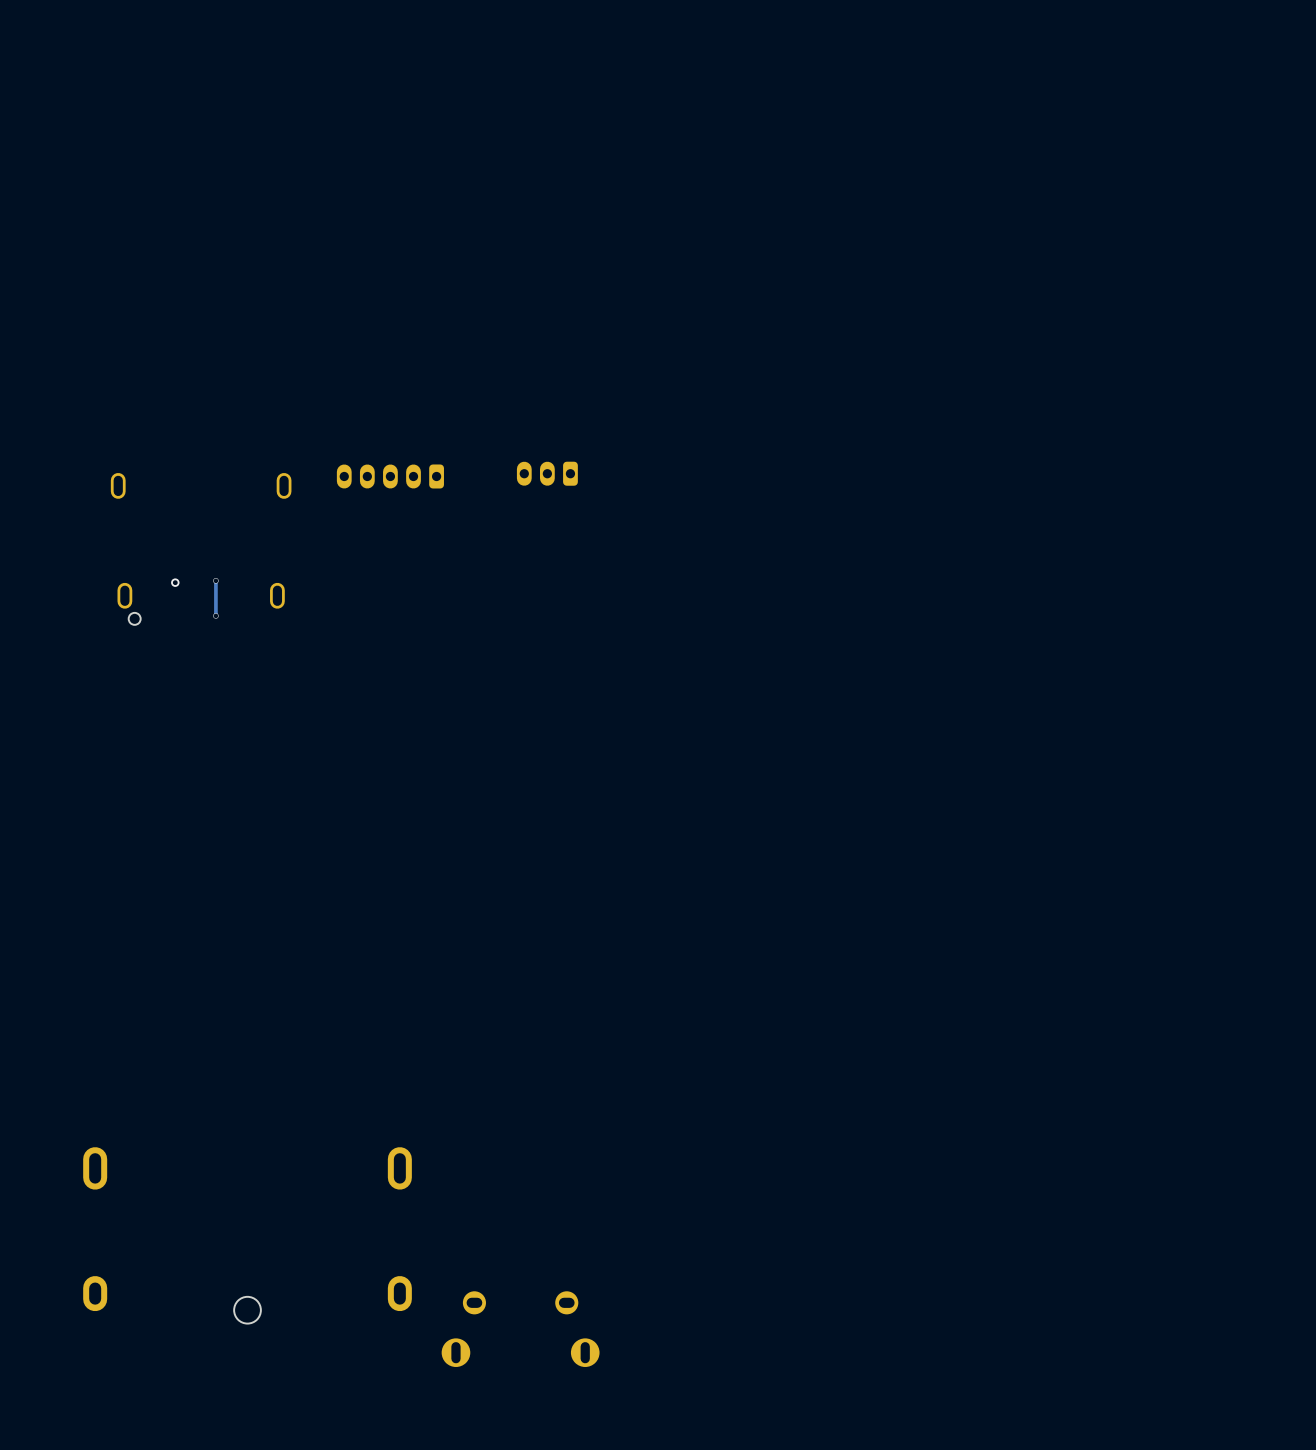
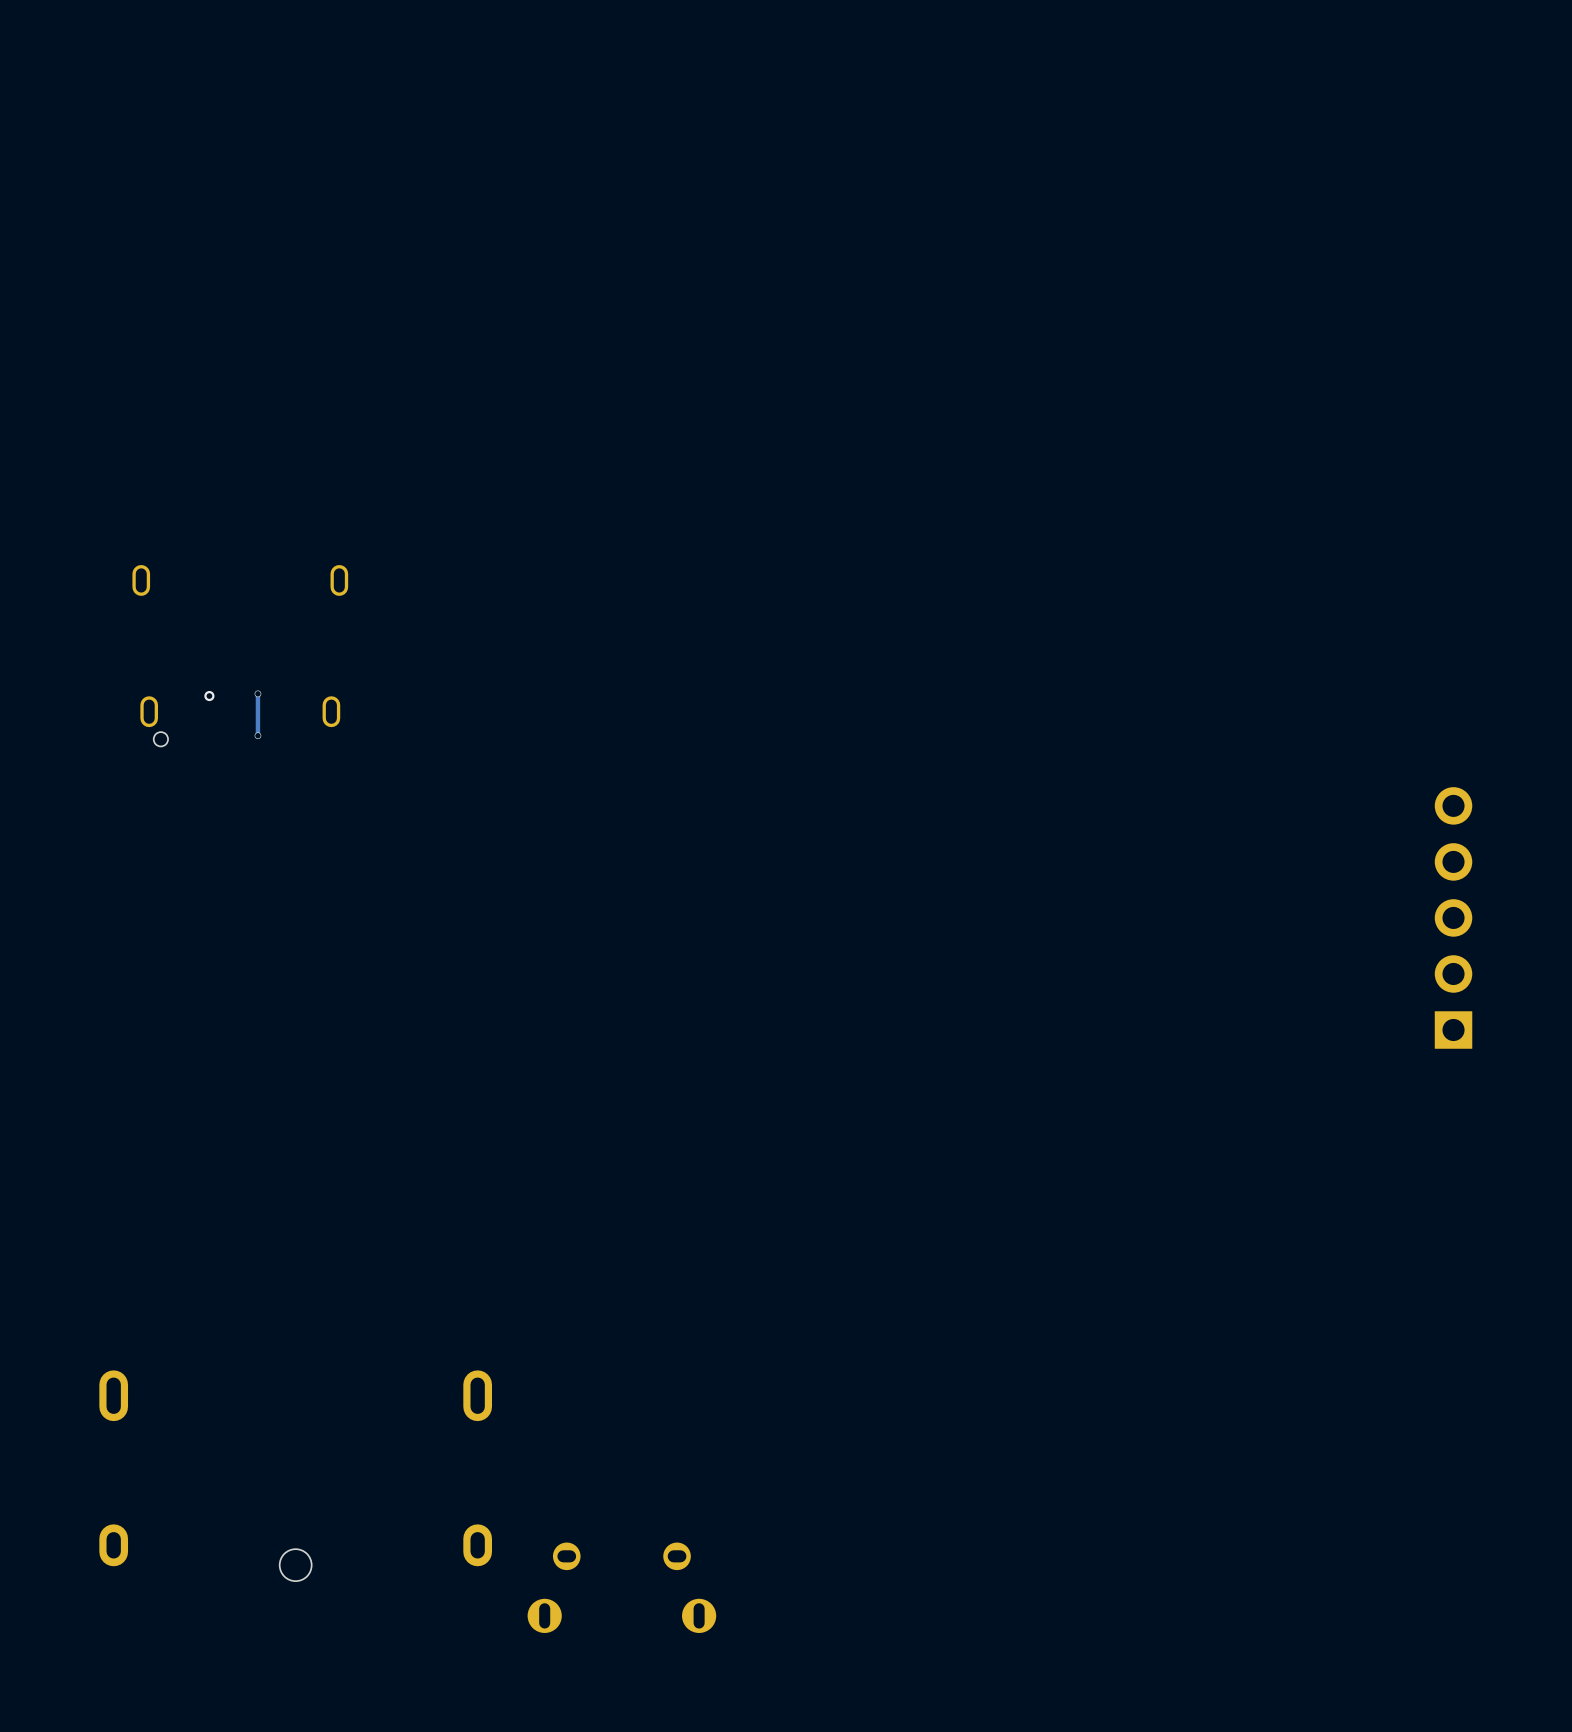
part: (547, 473) -> none
part: (390, 476) -> none
part: none -> (1453, 917)

